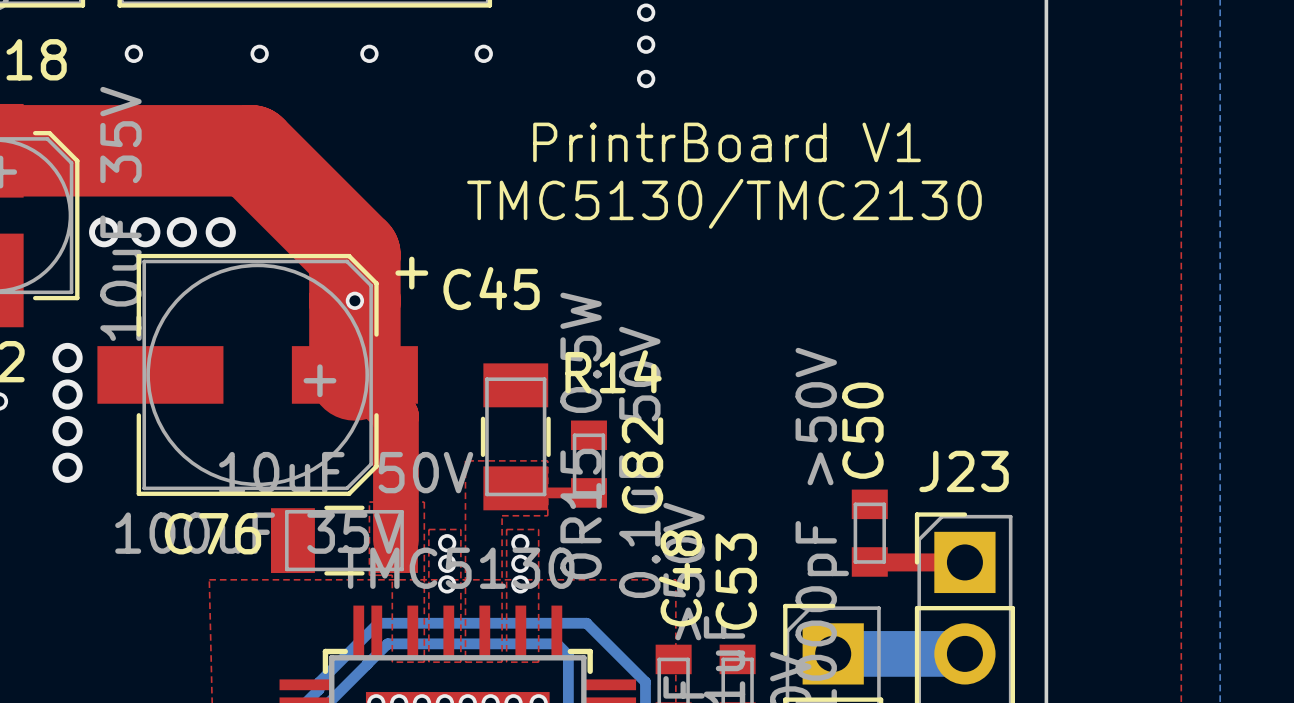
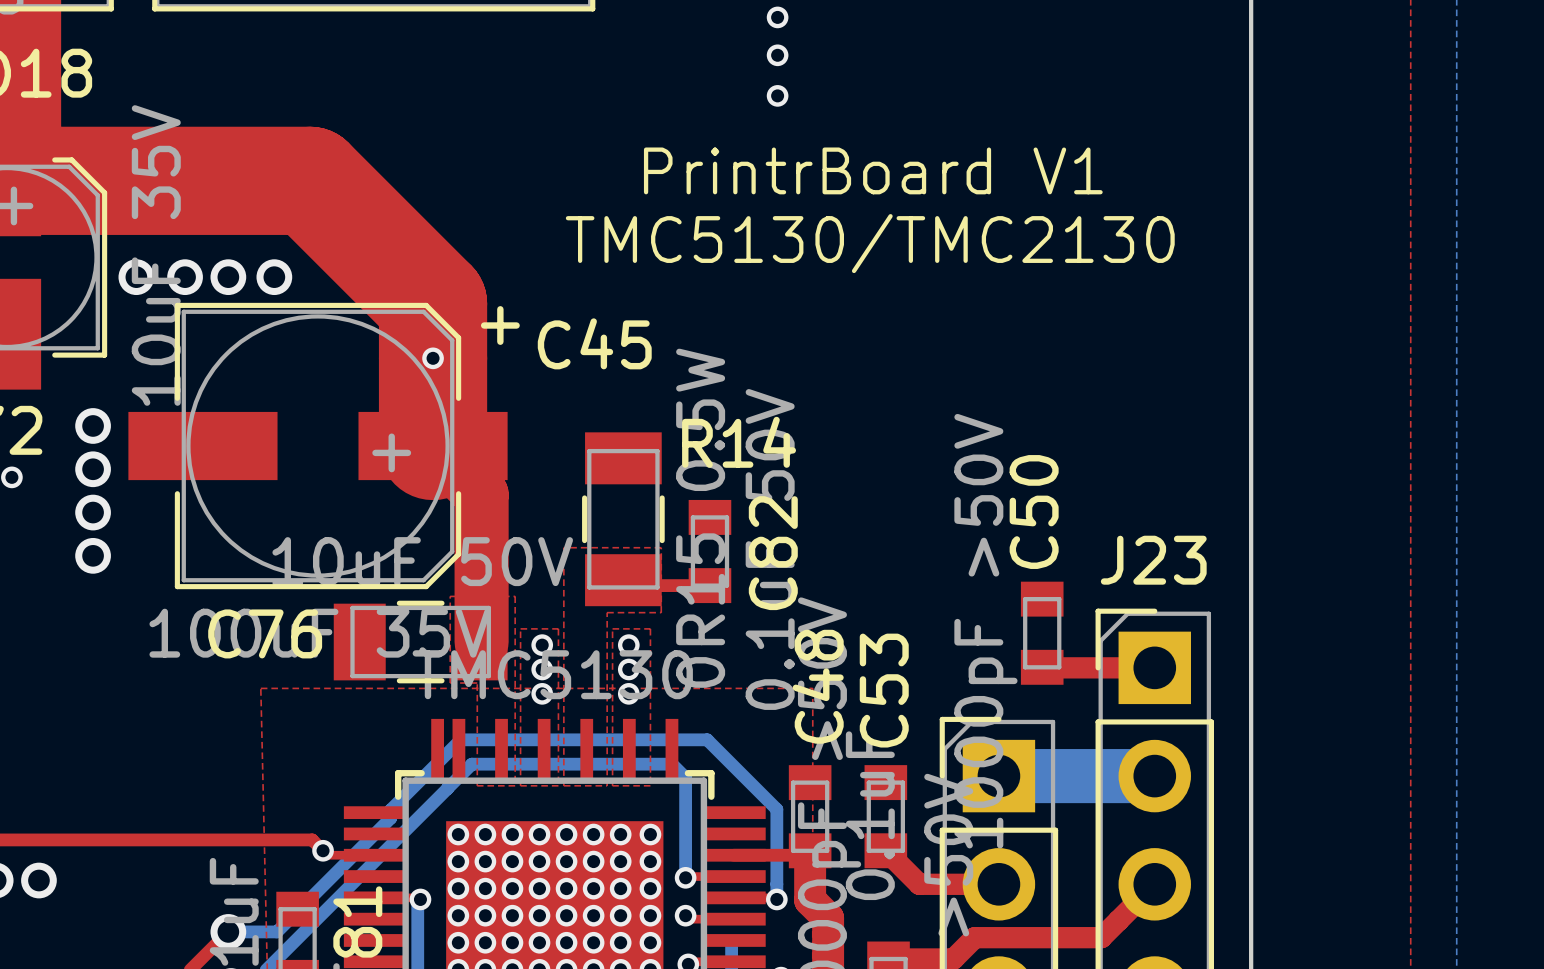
via: (133, 53) -> none
via: (259, 53) -> none
via: (369, 53) -> none
via: (483, 53) -> none

